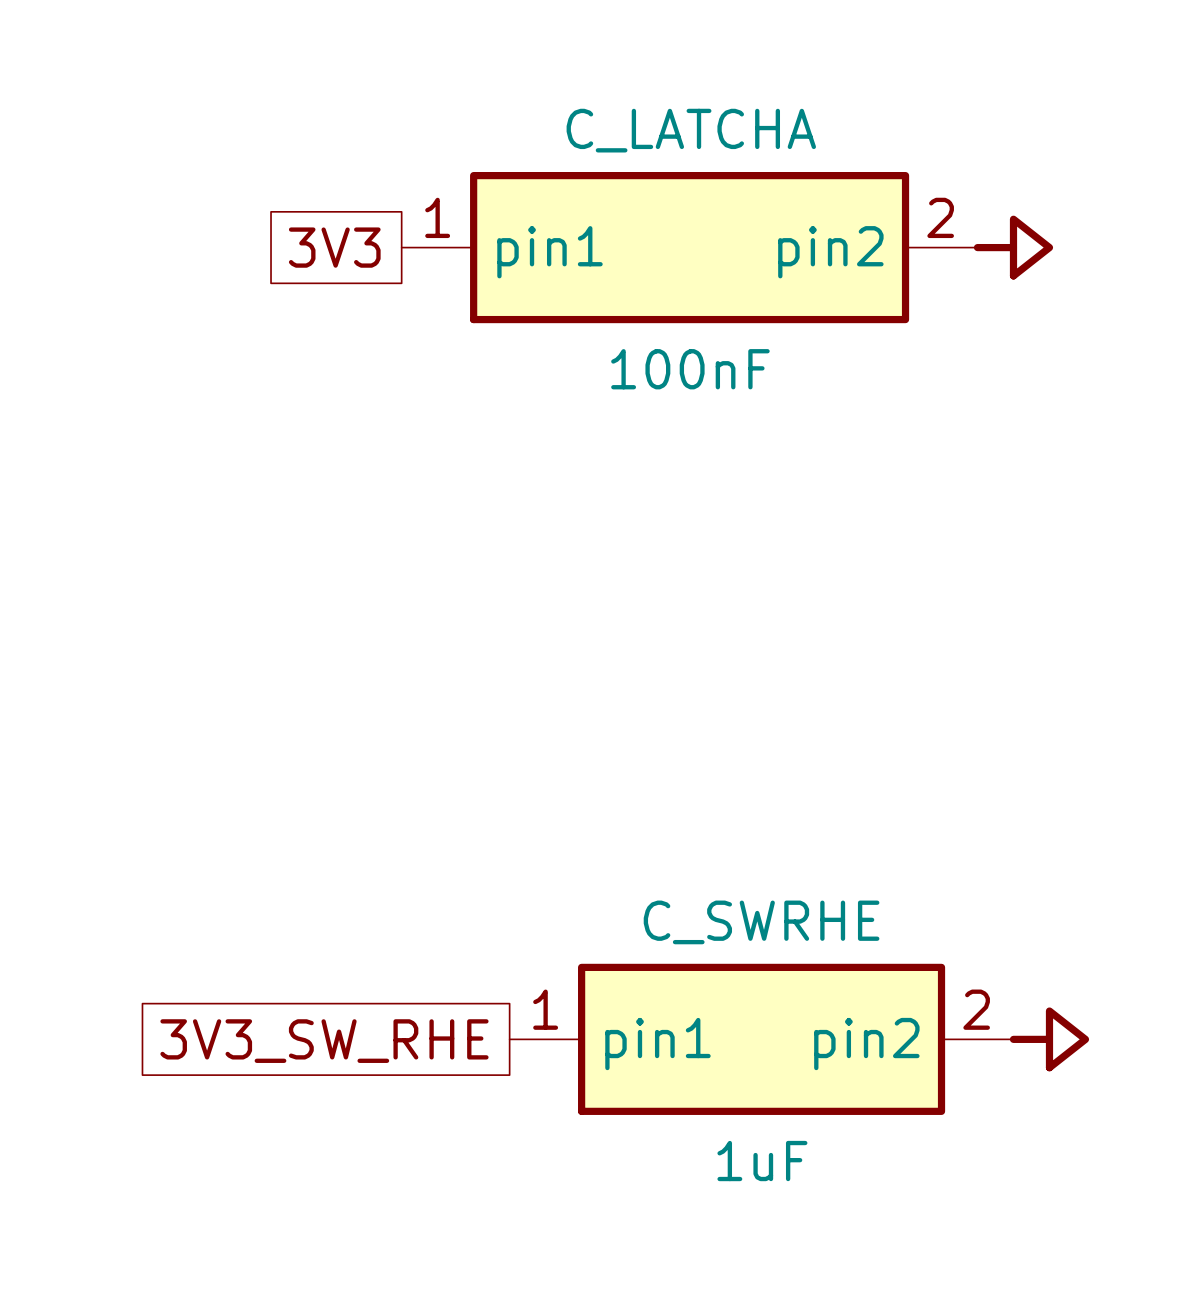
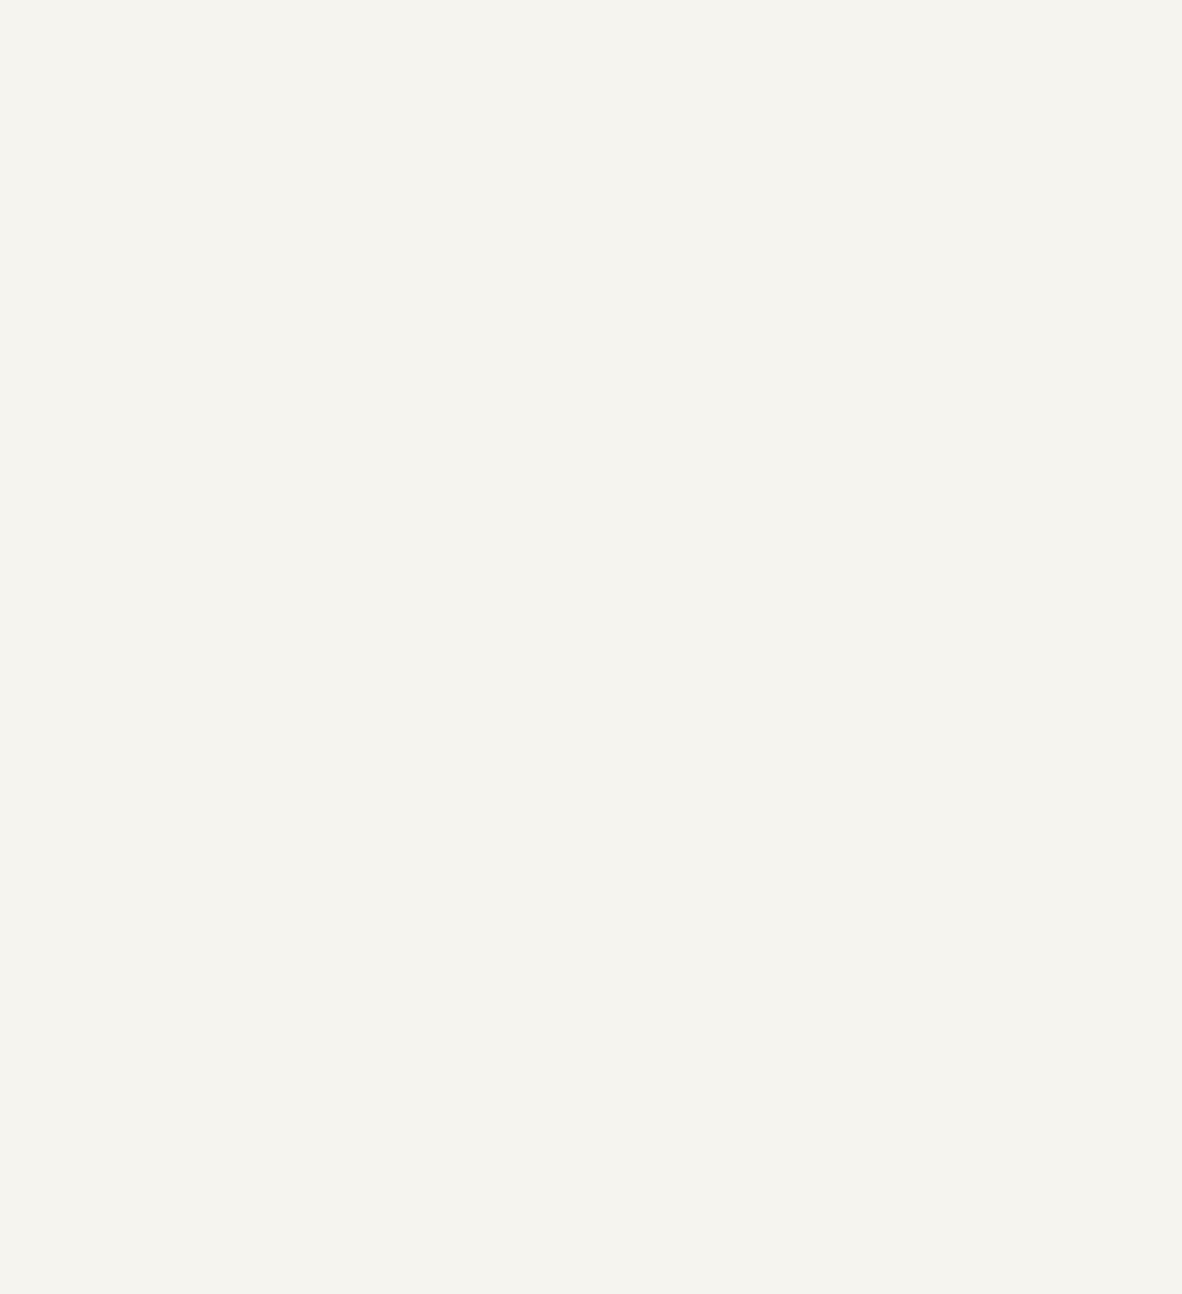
global label: 3V3 (334, 247) -> none
C_LATCHA: 100nF (689, 247) -> none
power symbol: (1013, 247) -> none
C_SWRHE: 1uF (761, 1039) -> none
power symbol: (1049, 1039) -> none
global label: 3V3_SW_RHE (324, 1041) -> none

